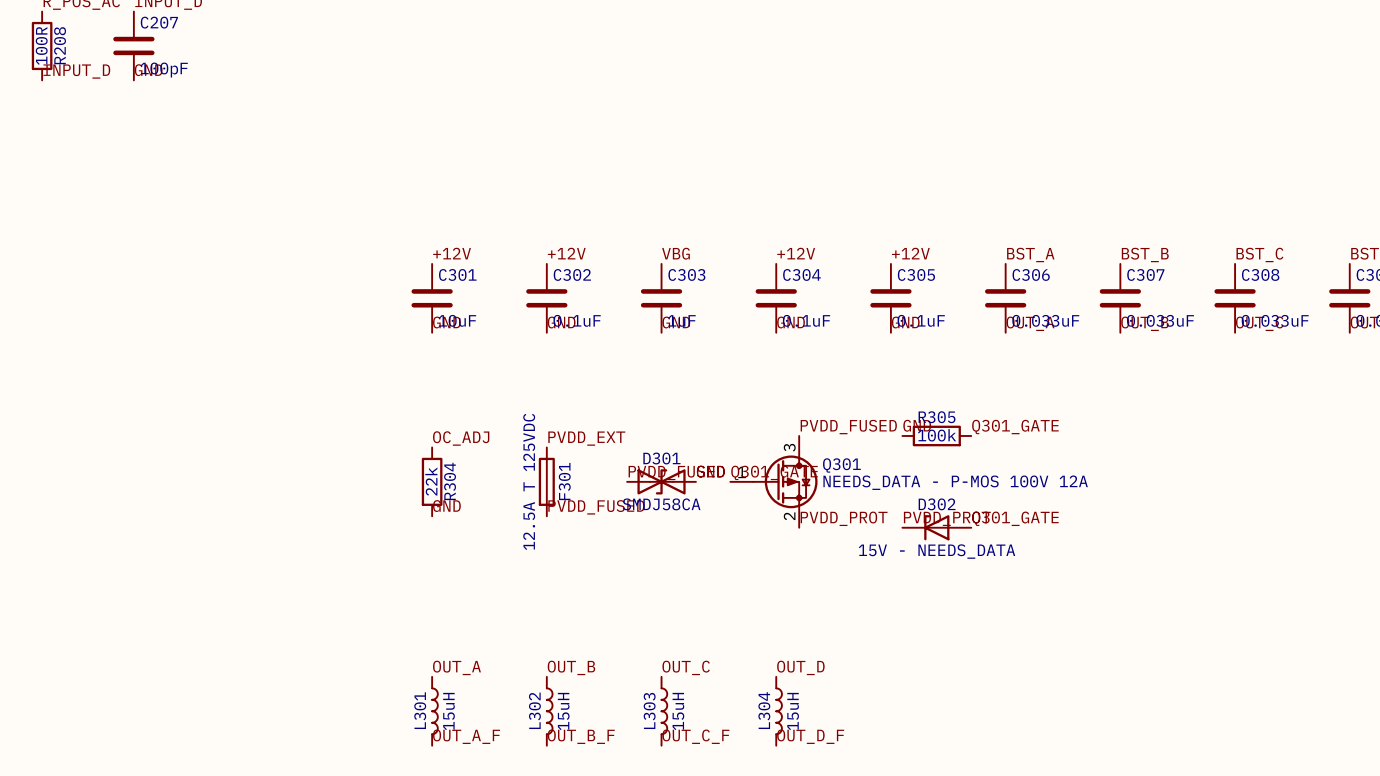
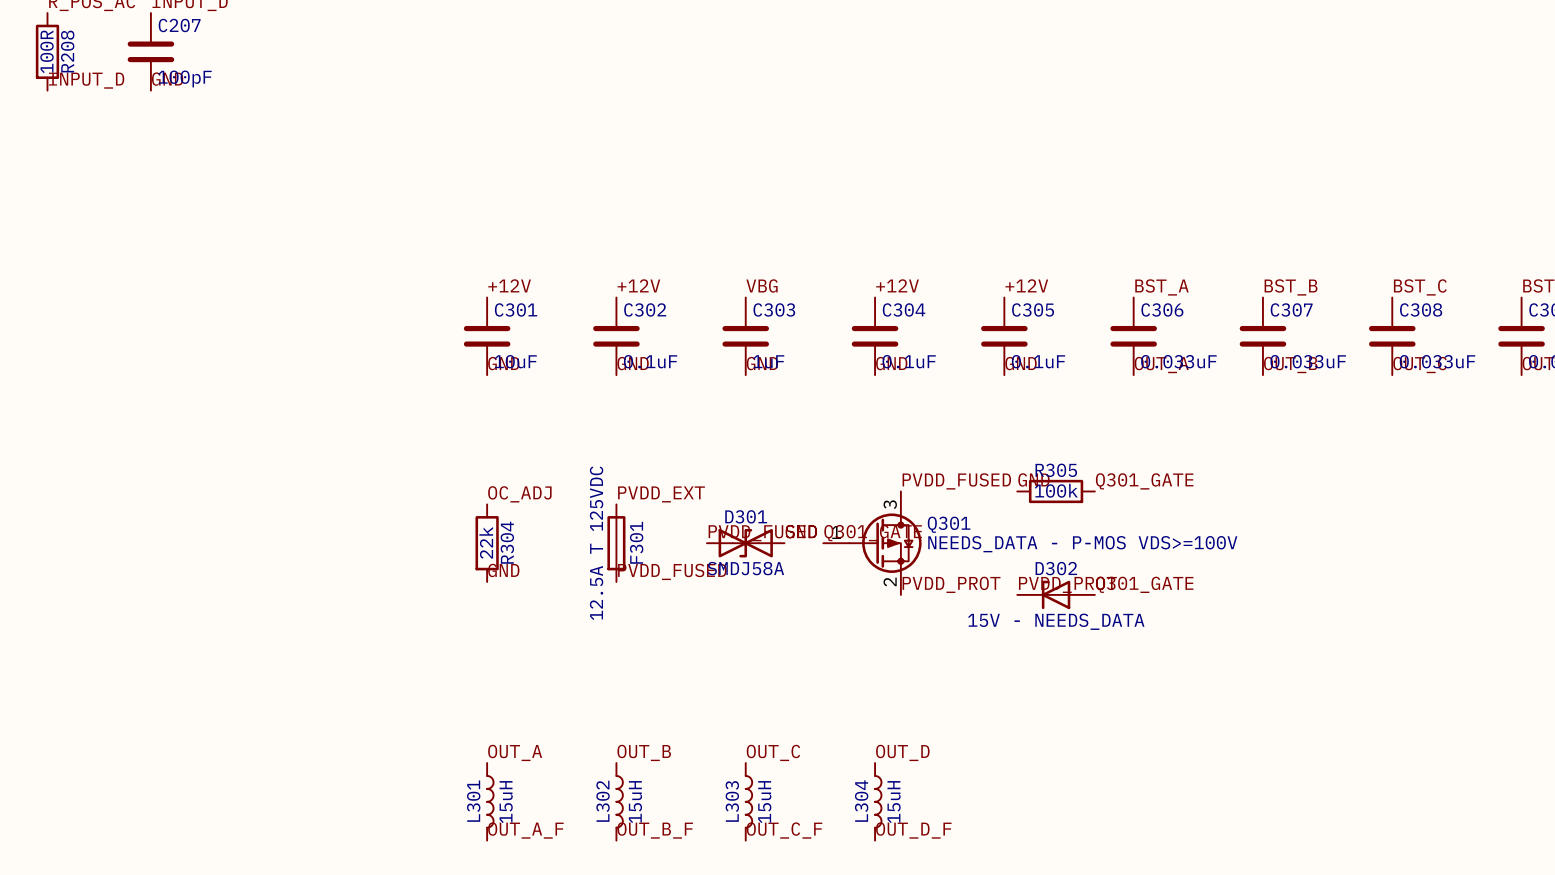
Q301 value: NEEDS_DATA - P-MOS 100V 12A (955, 482) -> NEEDS_DATA - P-MOS VDS>=100V (1082, 544)
D301 value: SMDJ58CA (661, 504) -> SMDJ58A (745, 568)

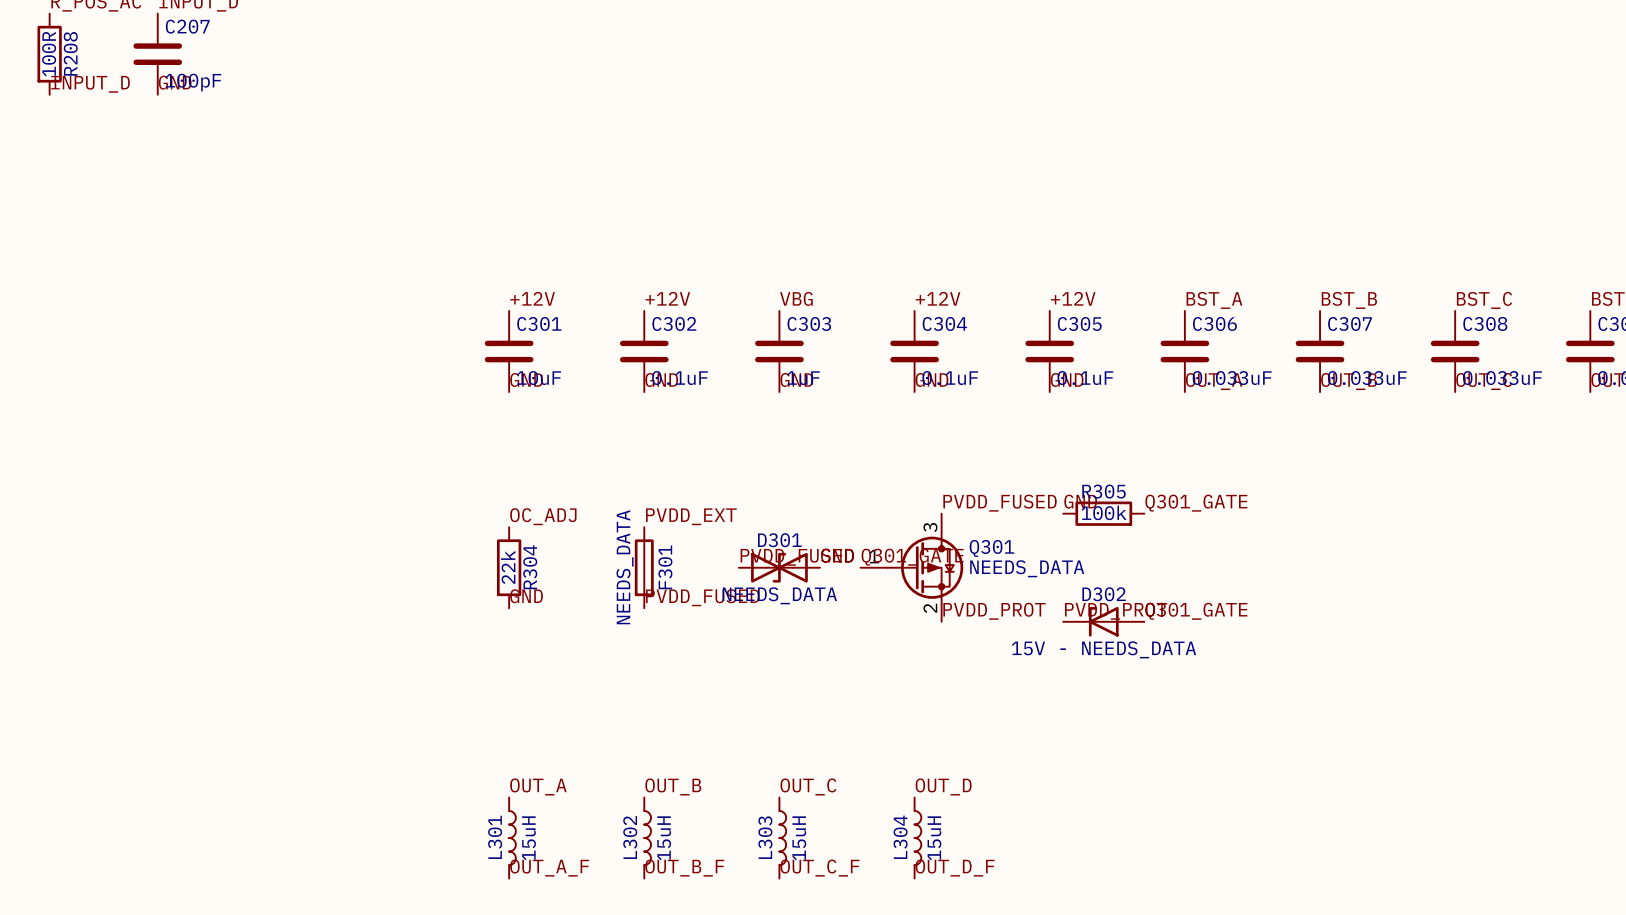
F301 value: 12.5A T 125VDC (596, 543) -> NEEDS_DATA (625, 567)
Q301 value: NEEDS_DATA - P-MOS VDS>=100V (1082, 544) -> NEEDS_DATA (1027, 568)
D301 value: SMDJ58A (745, 568) -> NEEDS_DATA (779, 595)

